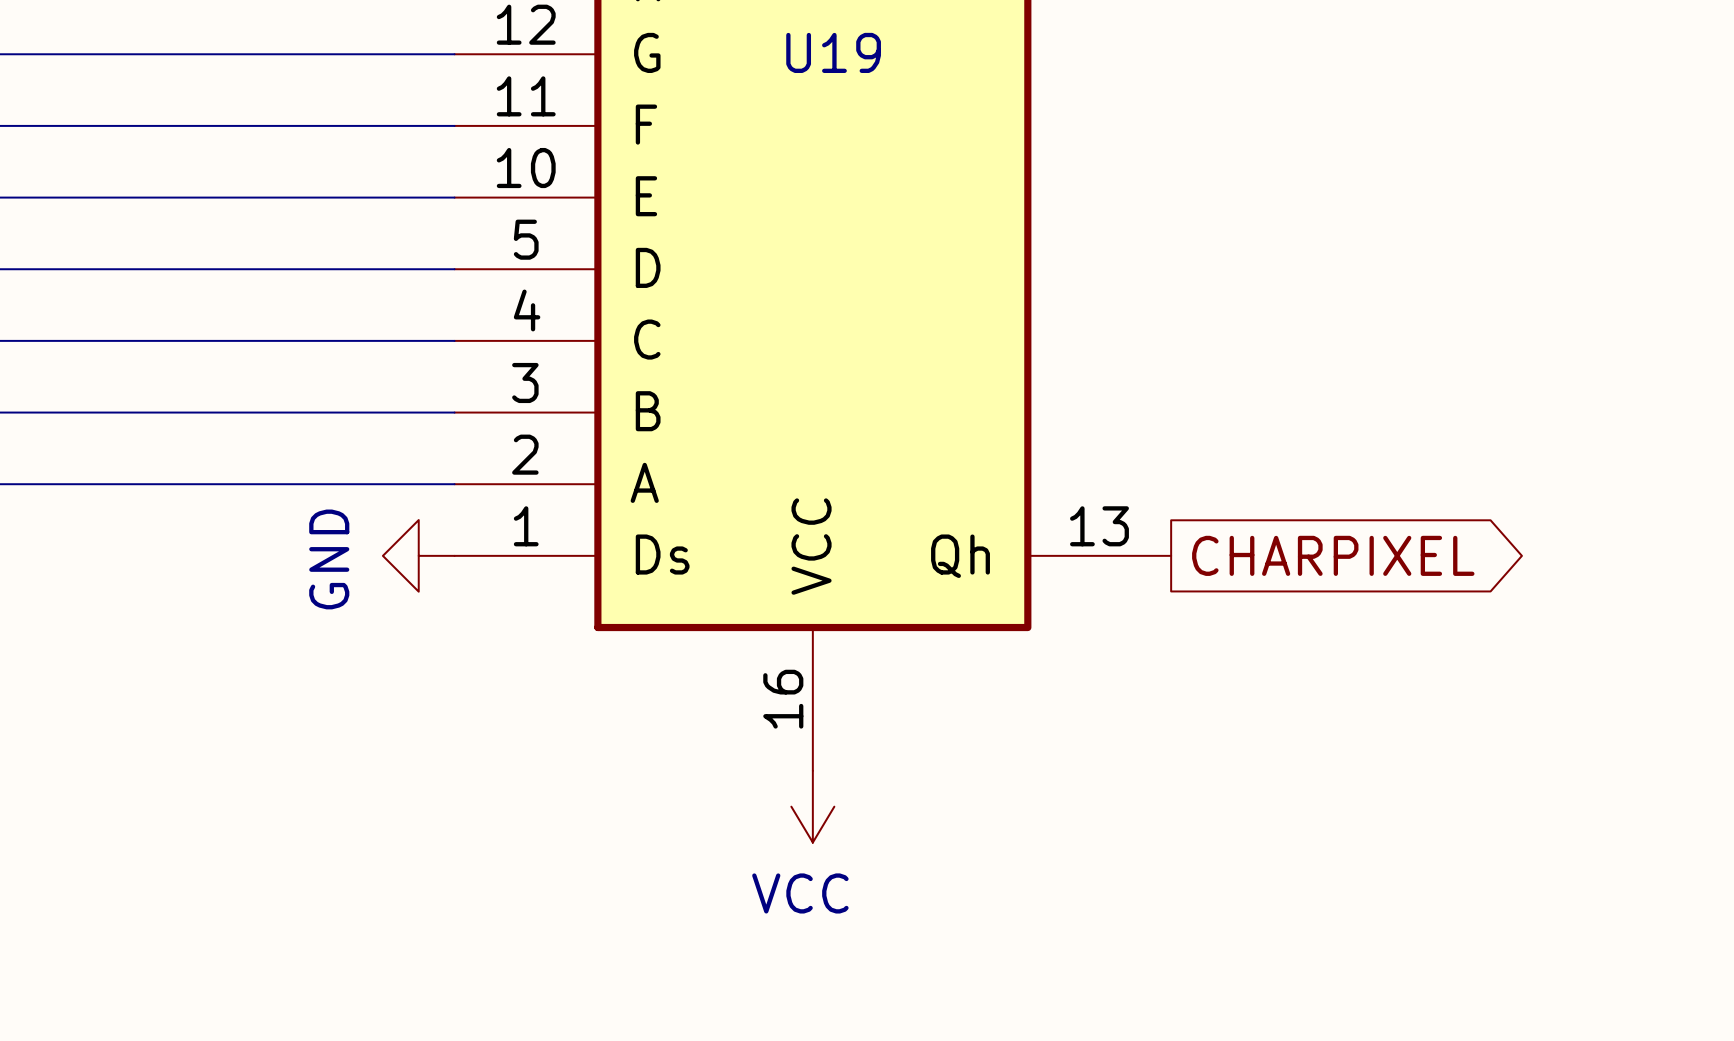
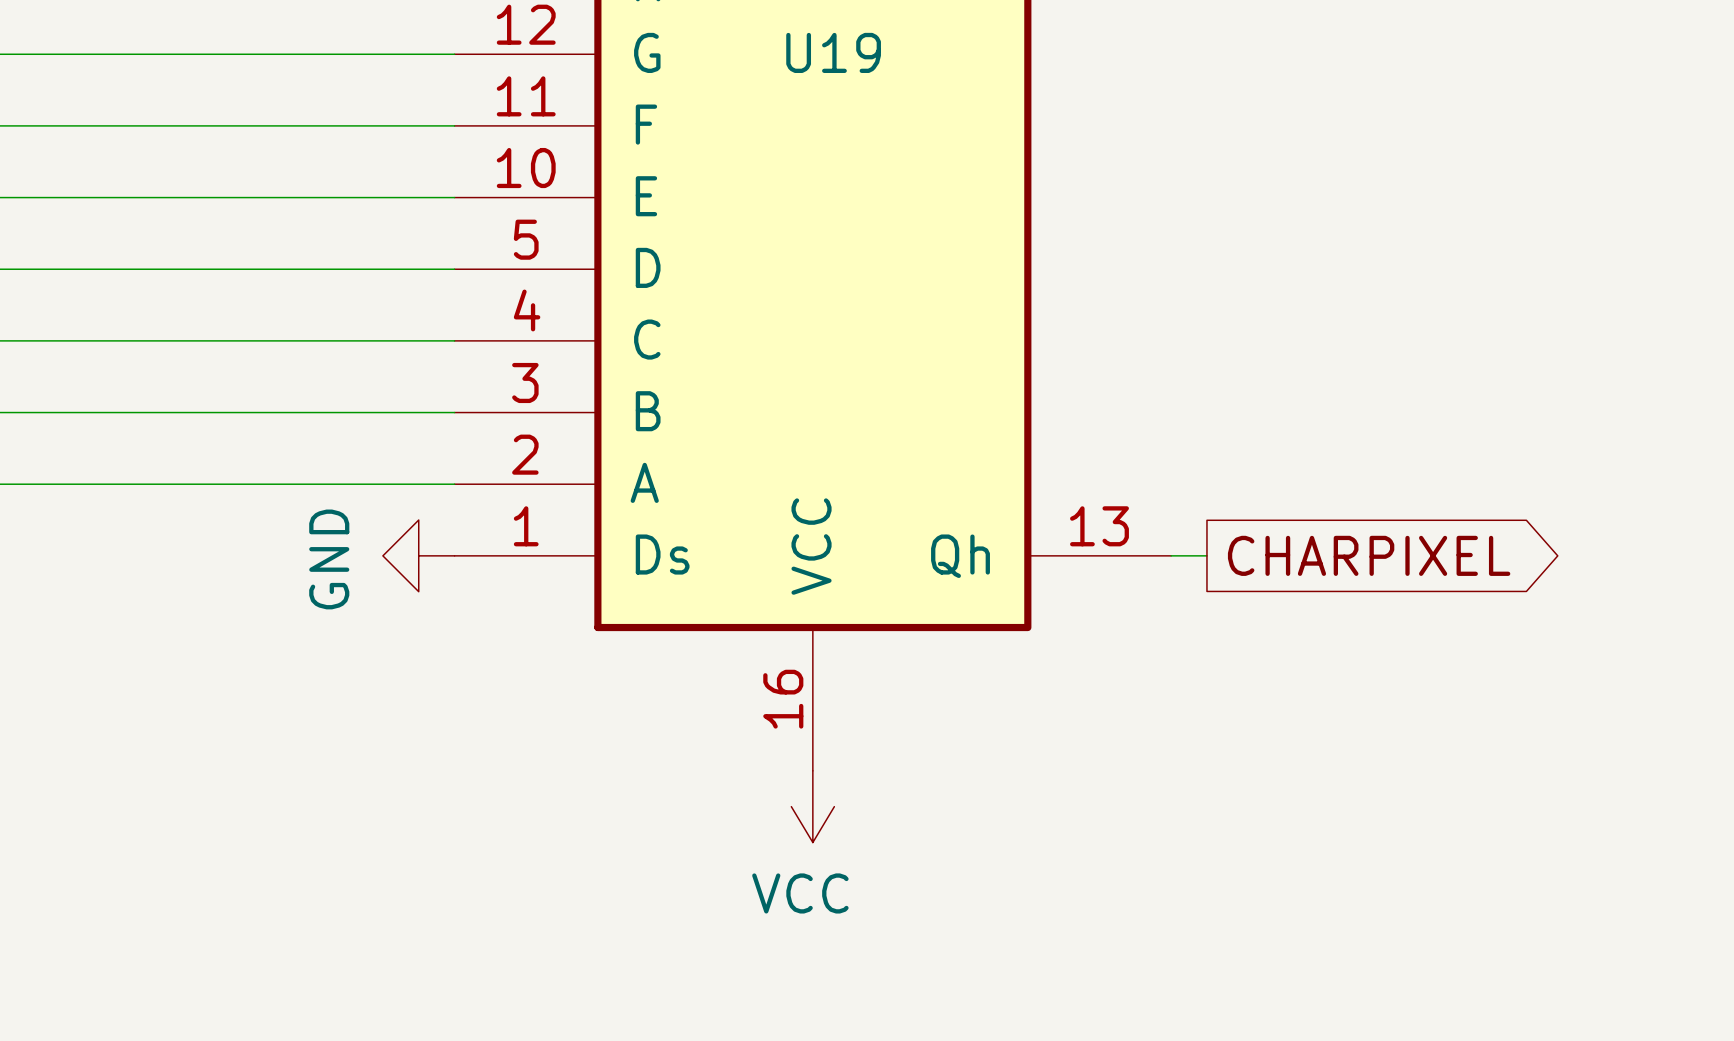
wire: none -> (1171, 555) (1206, 555)
global label position: CHARPIXEL (1333, 555) -> CHARPIXEL (1369, 555)

